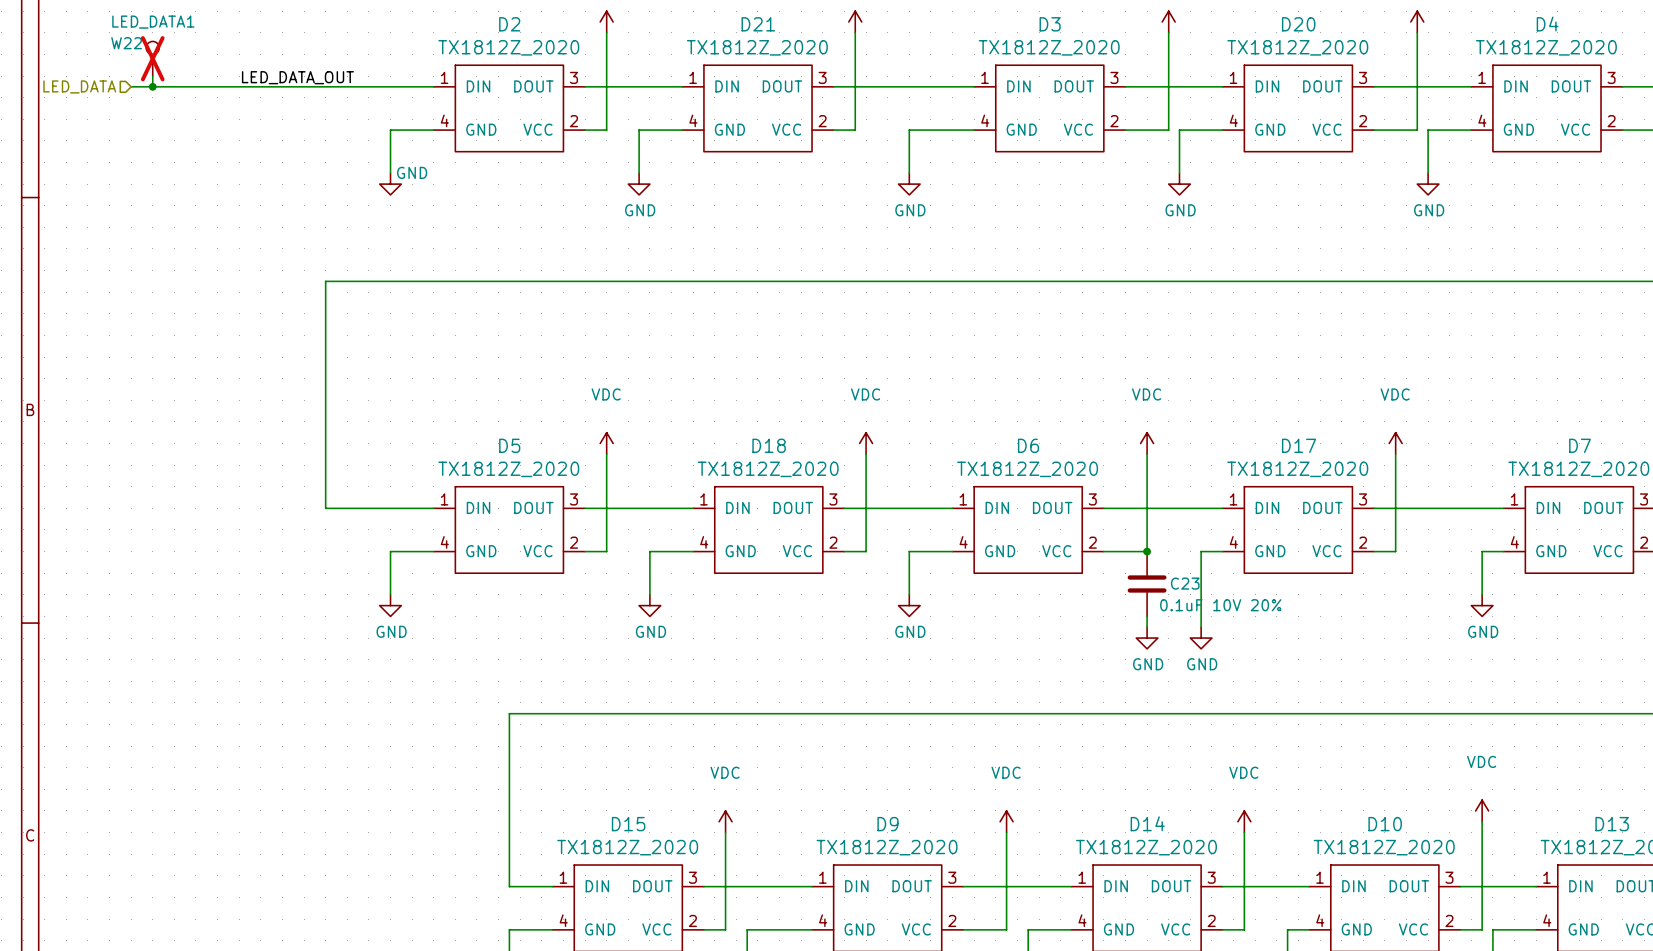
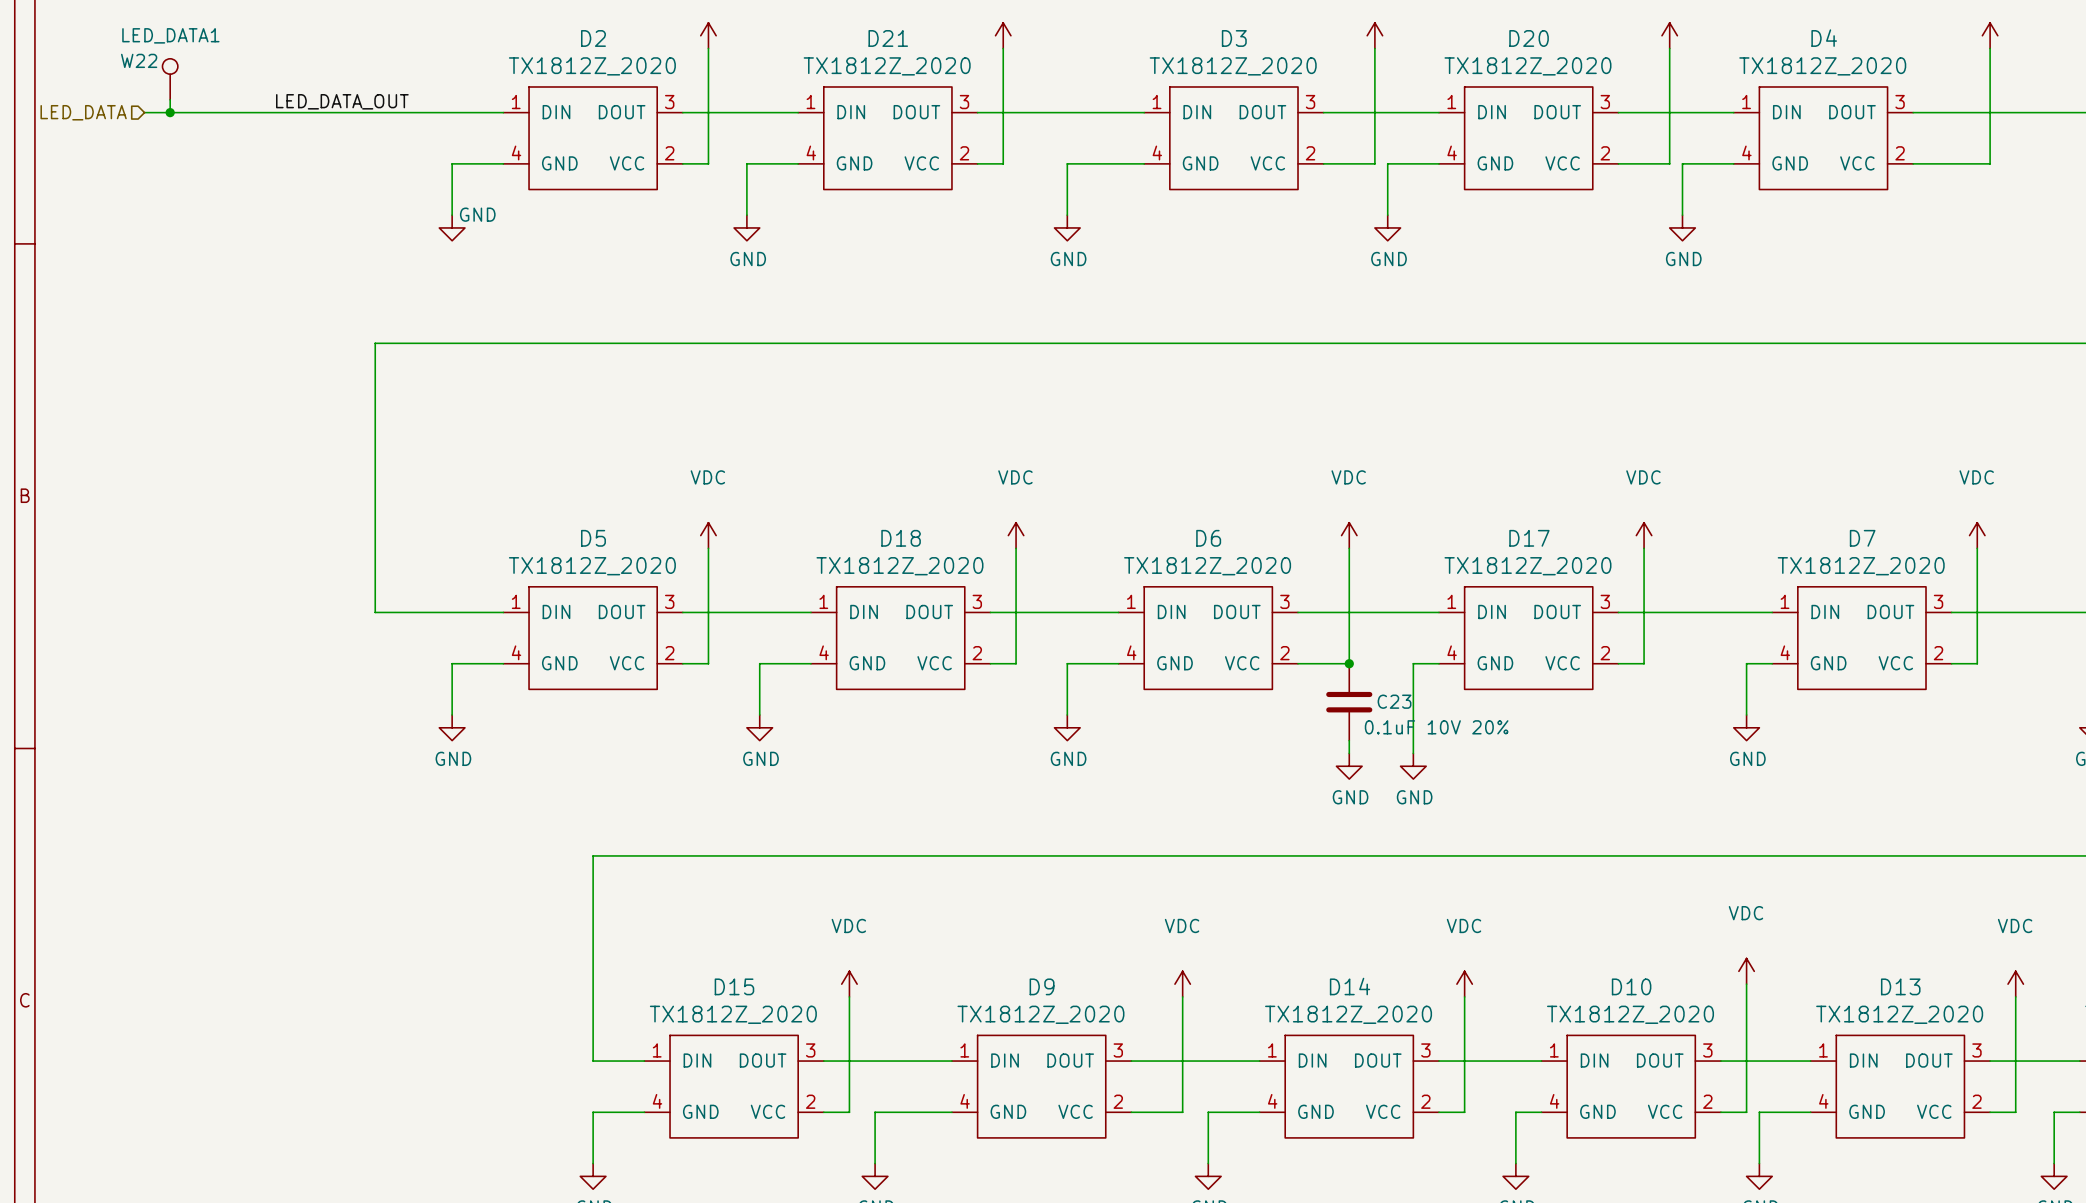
W22 do-not-place cross: (152, 58) -> none

